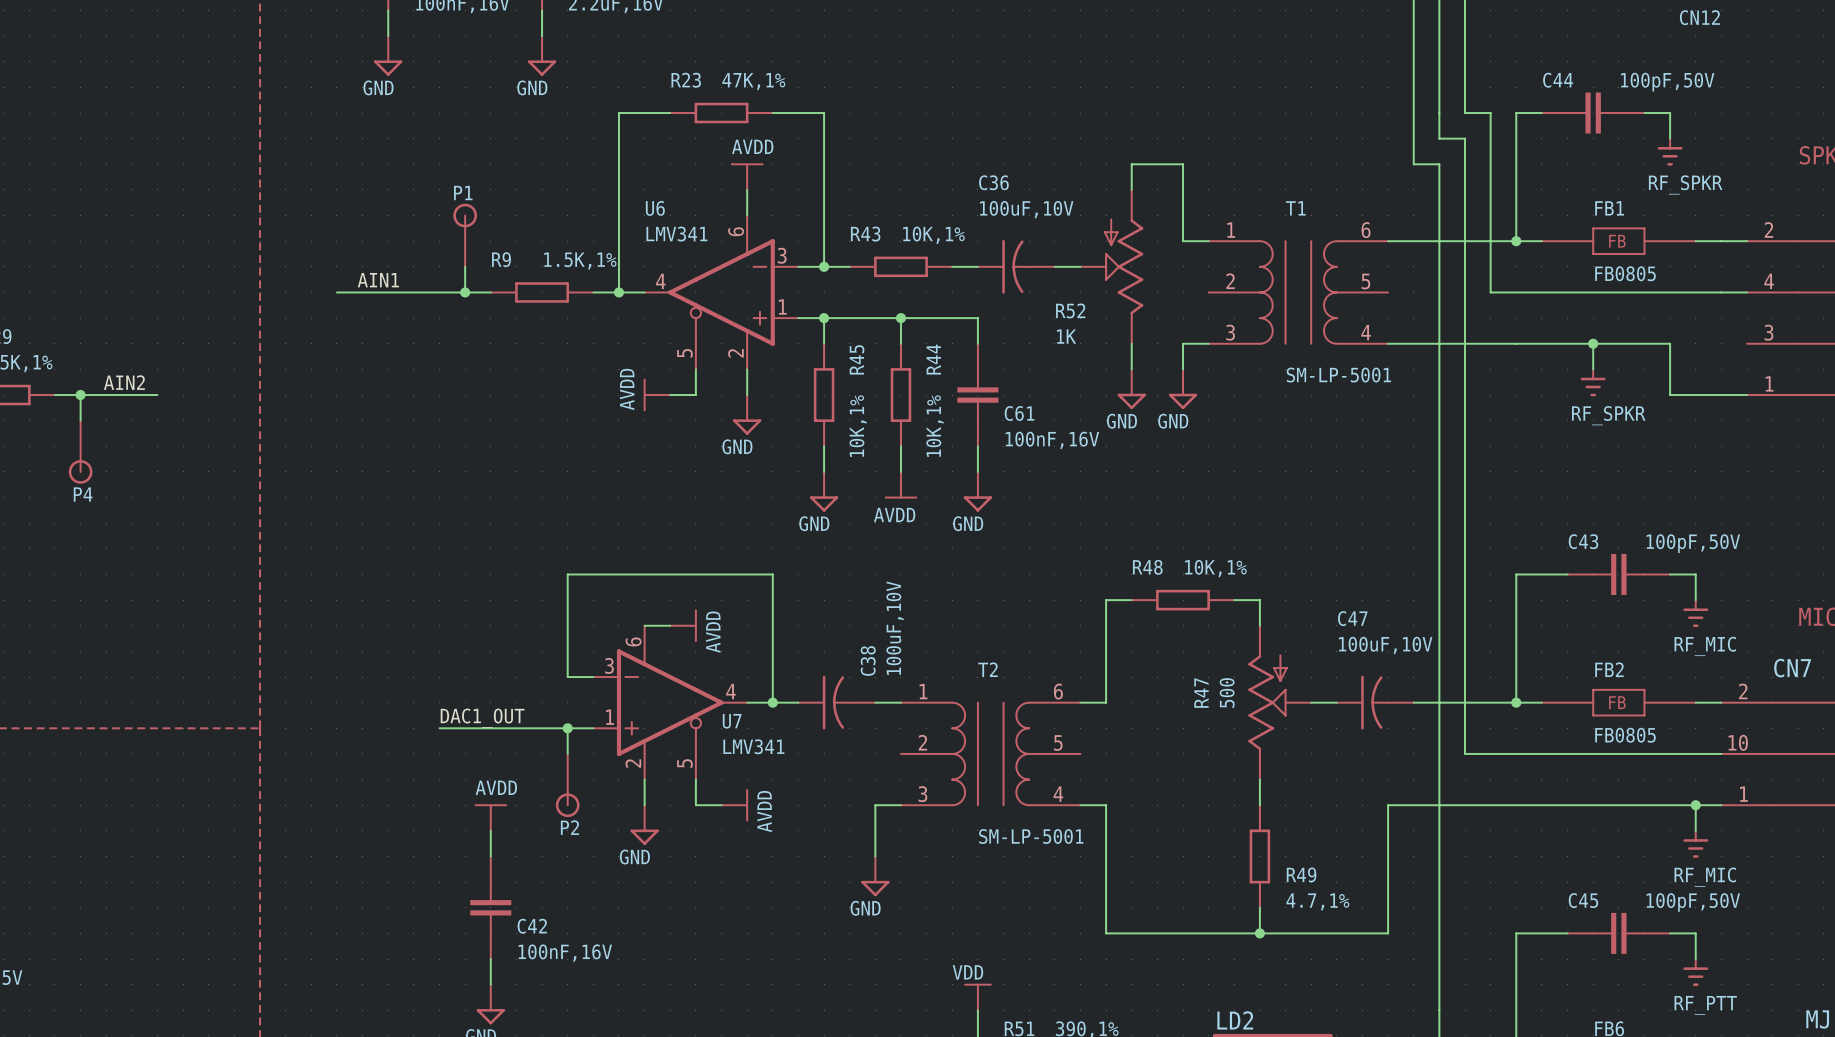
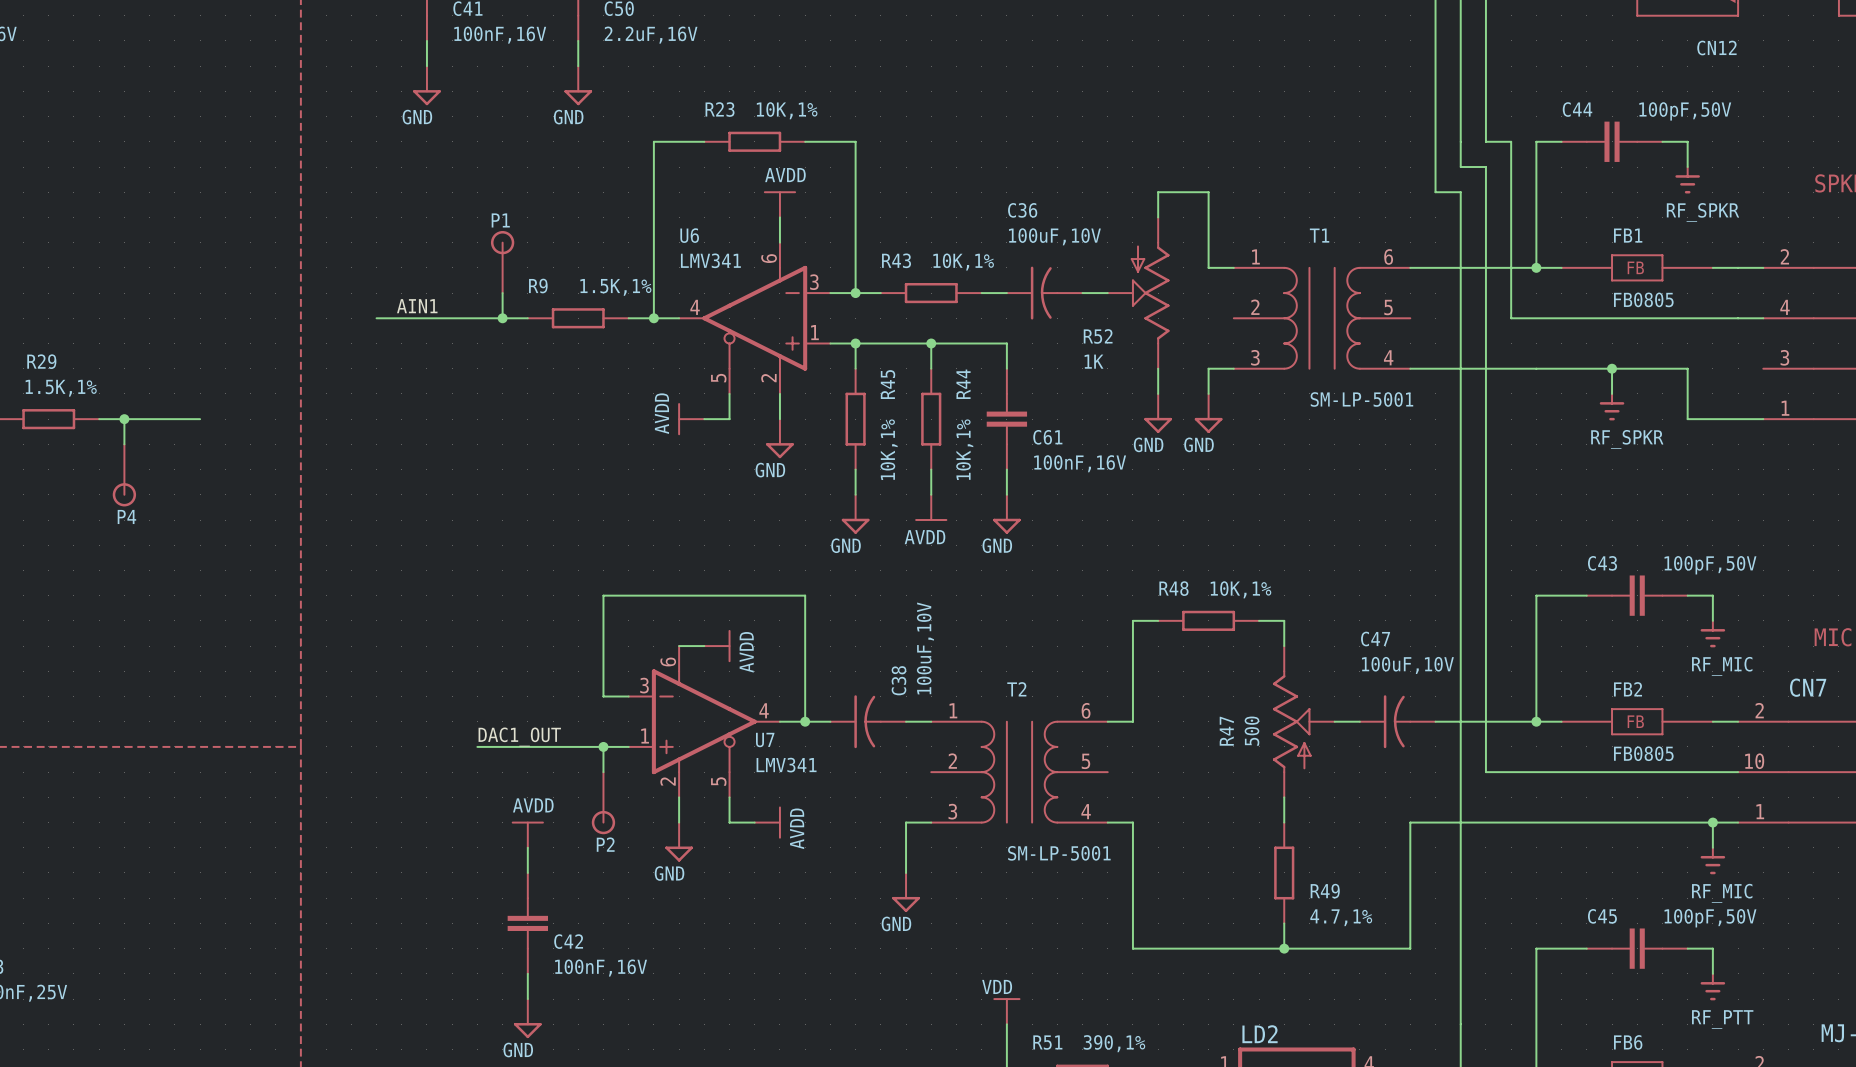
R23 value: 47K,1% (753, 81) -> 10K,1% (787, 110)
label: AIN2 (124, 382) -> none
R47 flip: as is (1267, 702) -> up-down (1292, 721)

